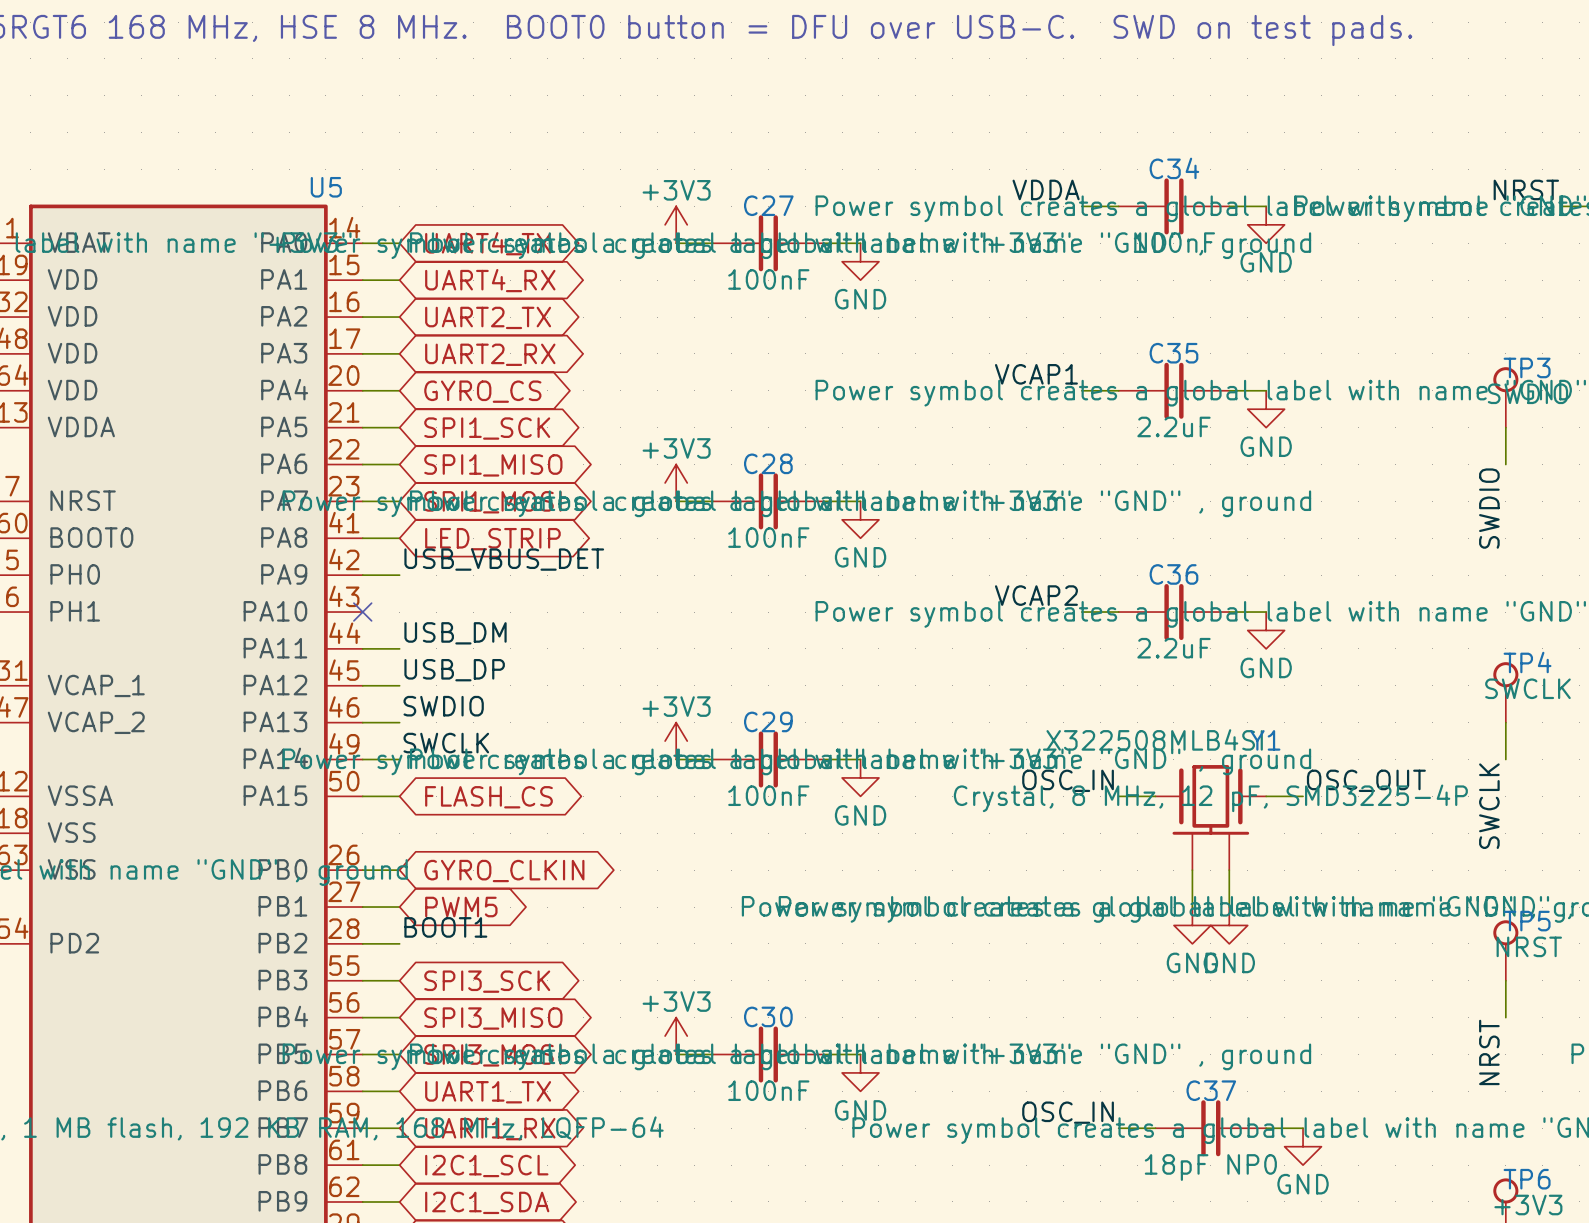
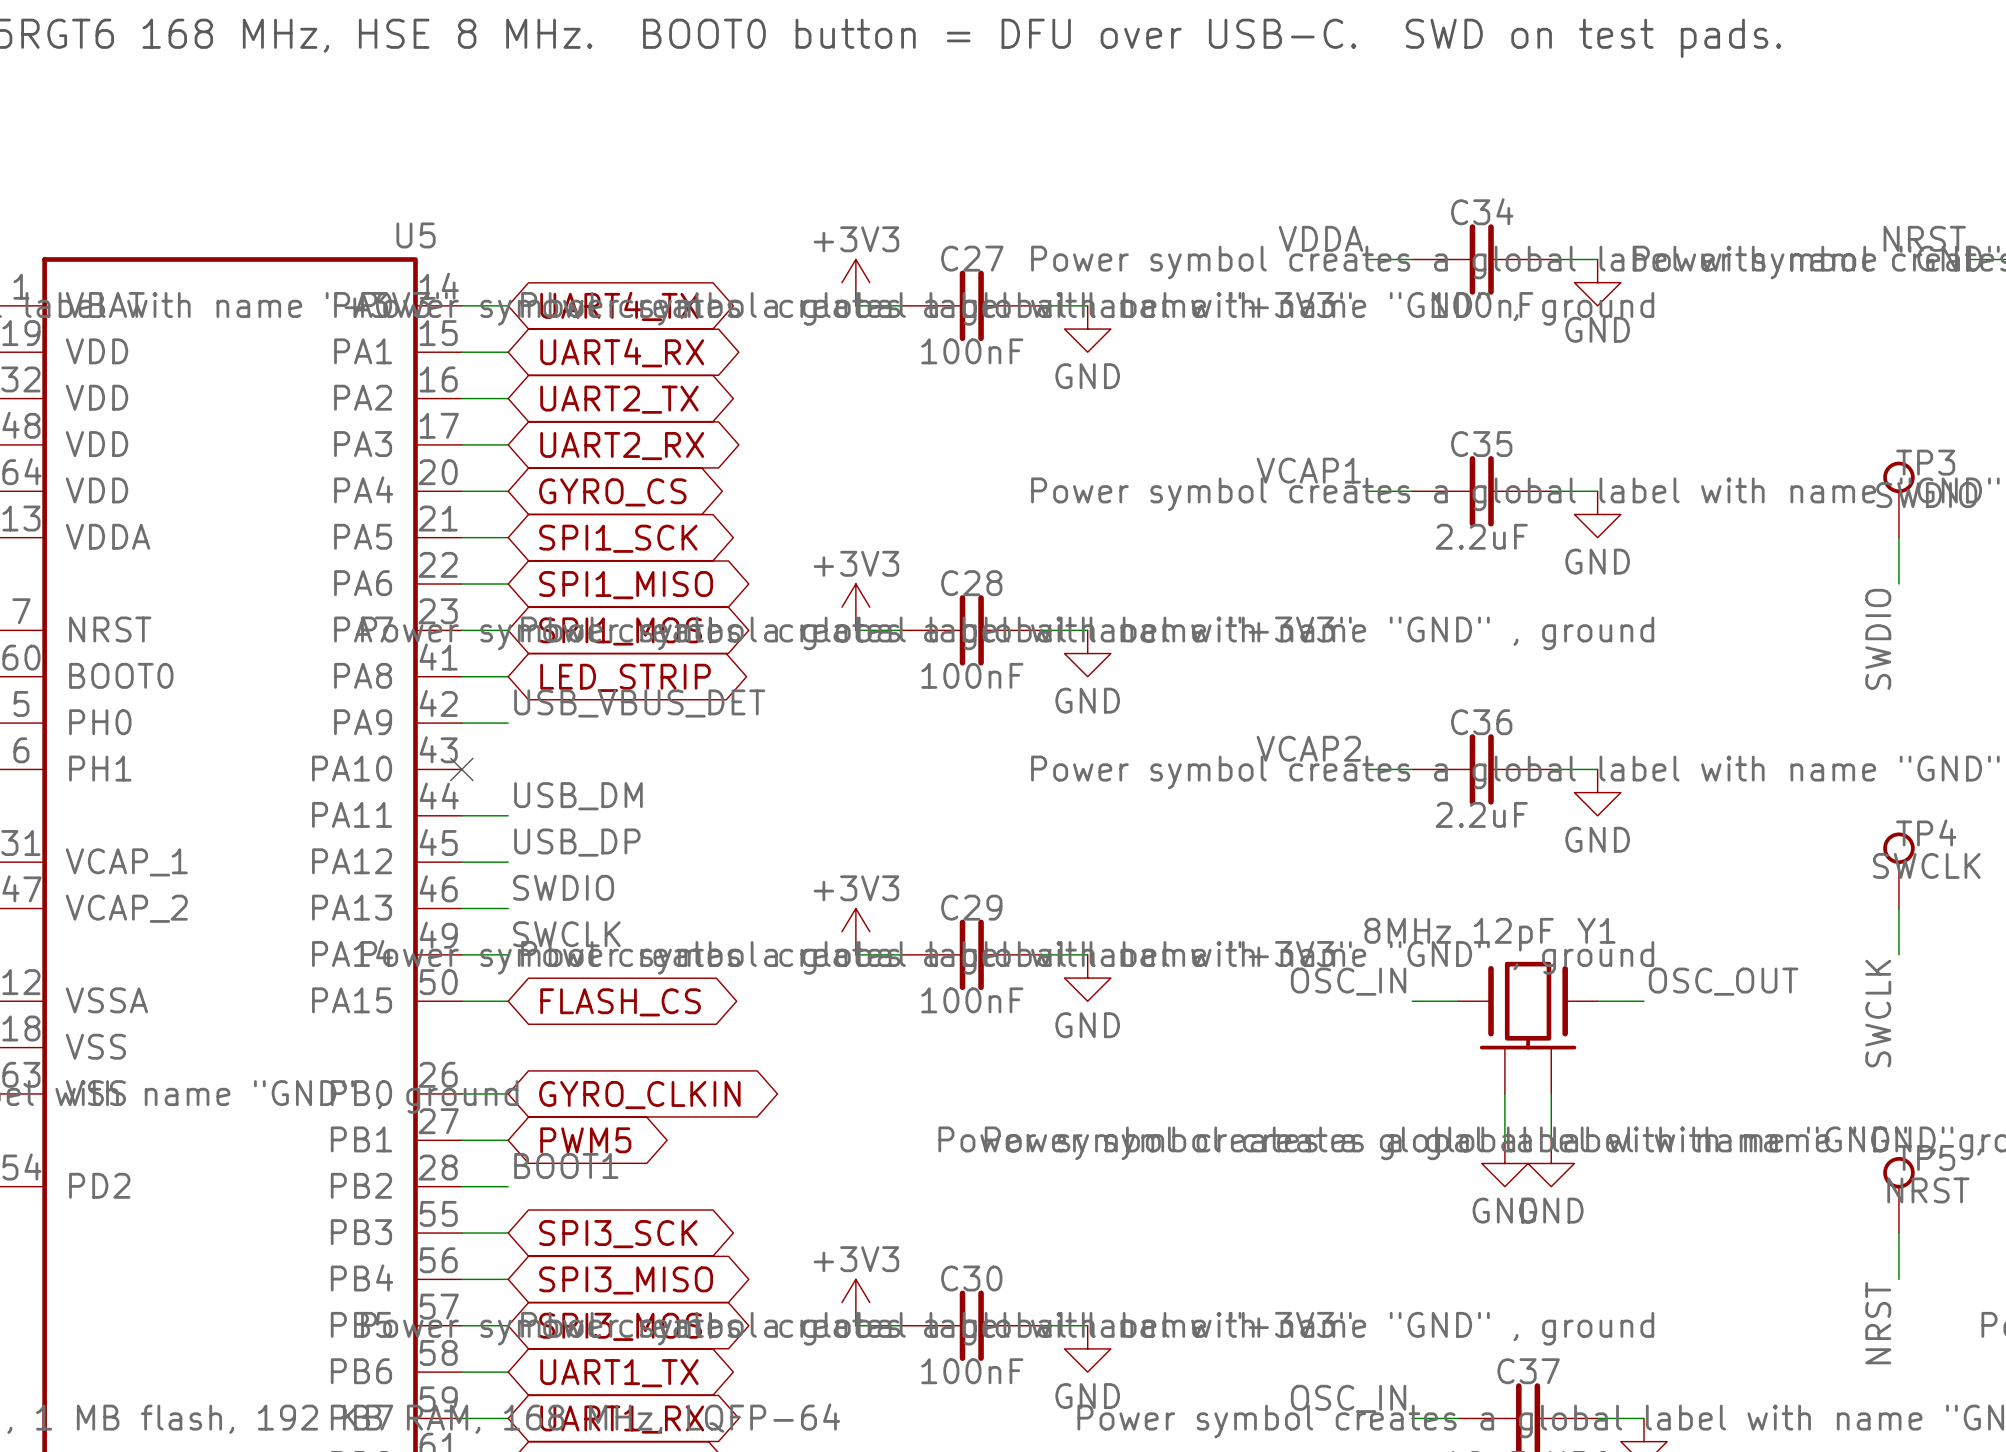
Y1 value: X322508MLB4SI (1154, 739) -> 8MHz 12pF (1459, 934)
Y1 text: Crystal, 8 MHz, 12 pF, SMD3225-4P (1210, 798) -> none

